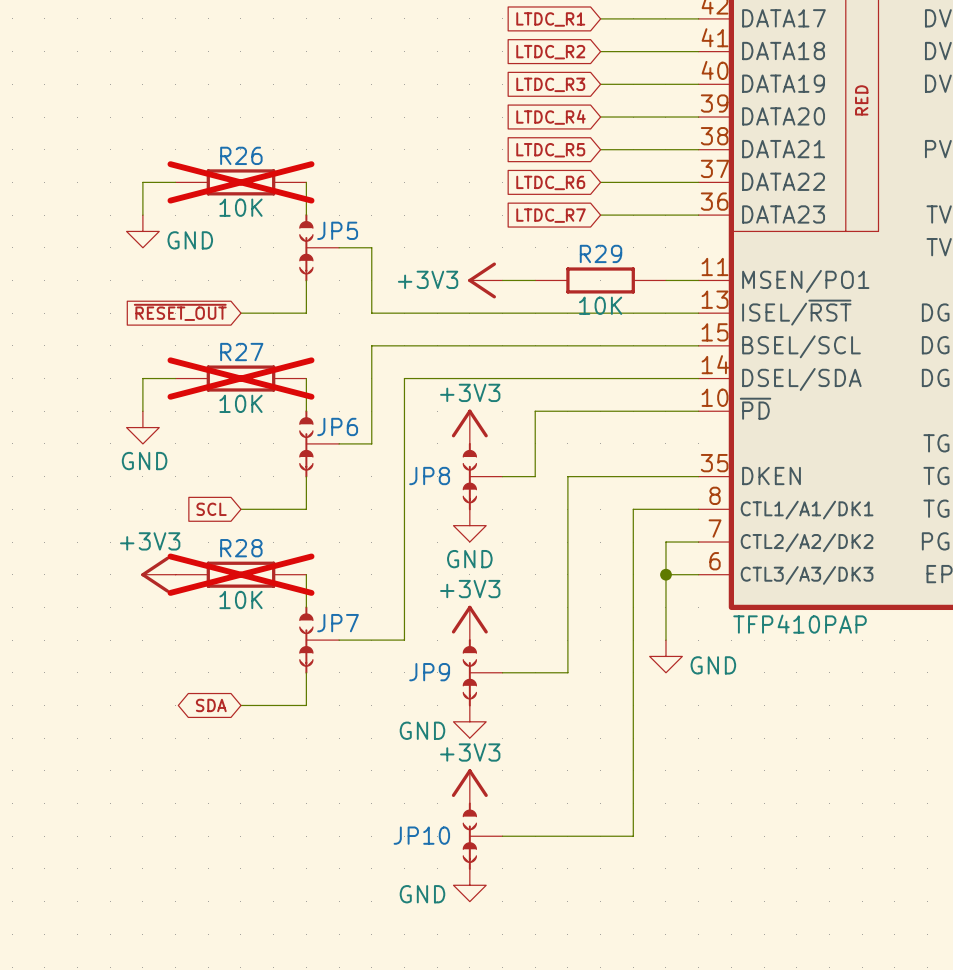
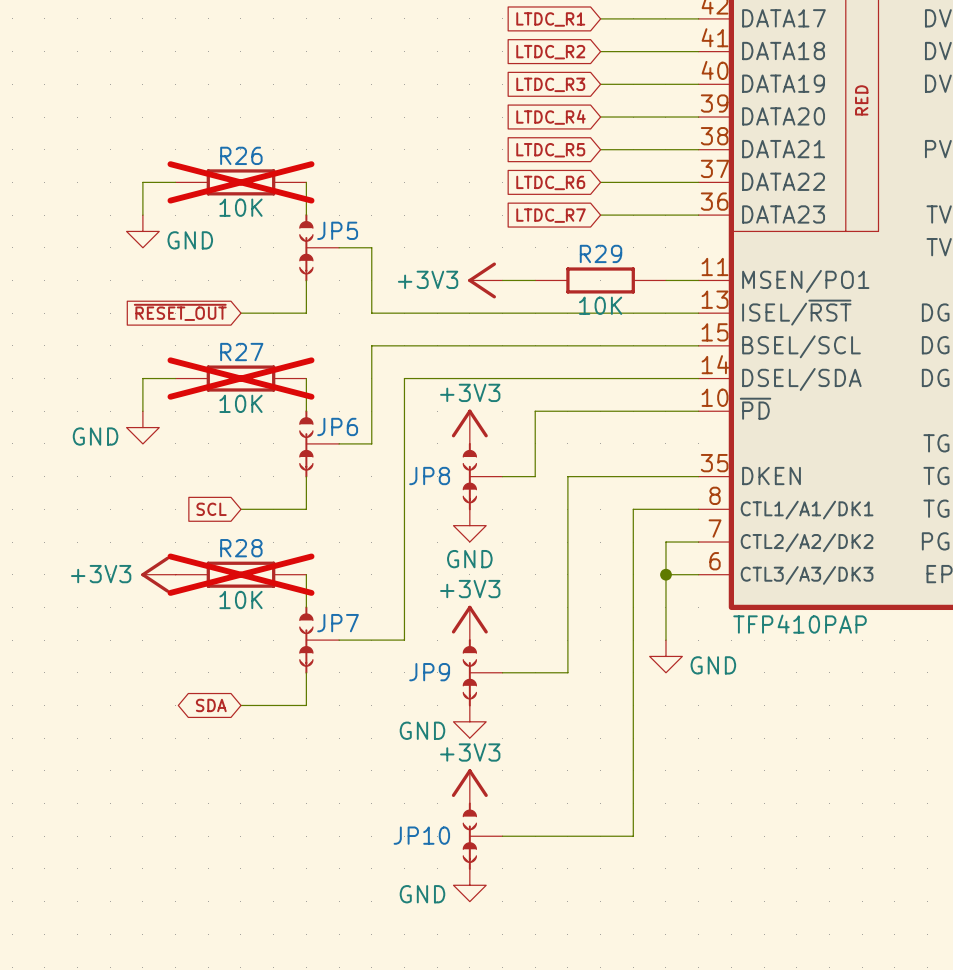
power symbol text position: GND (144, 461) -> GND (95, 436)
power symbol text position: +3V3 (150, 541) -> +3V3 (101, 574)

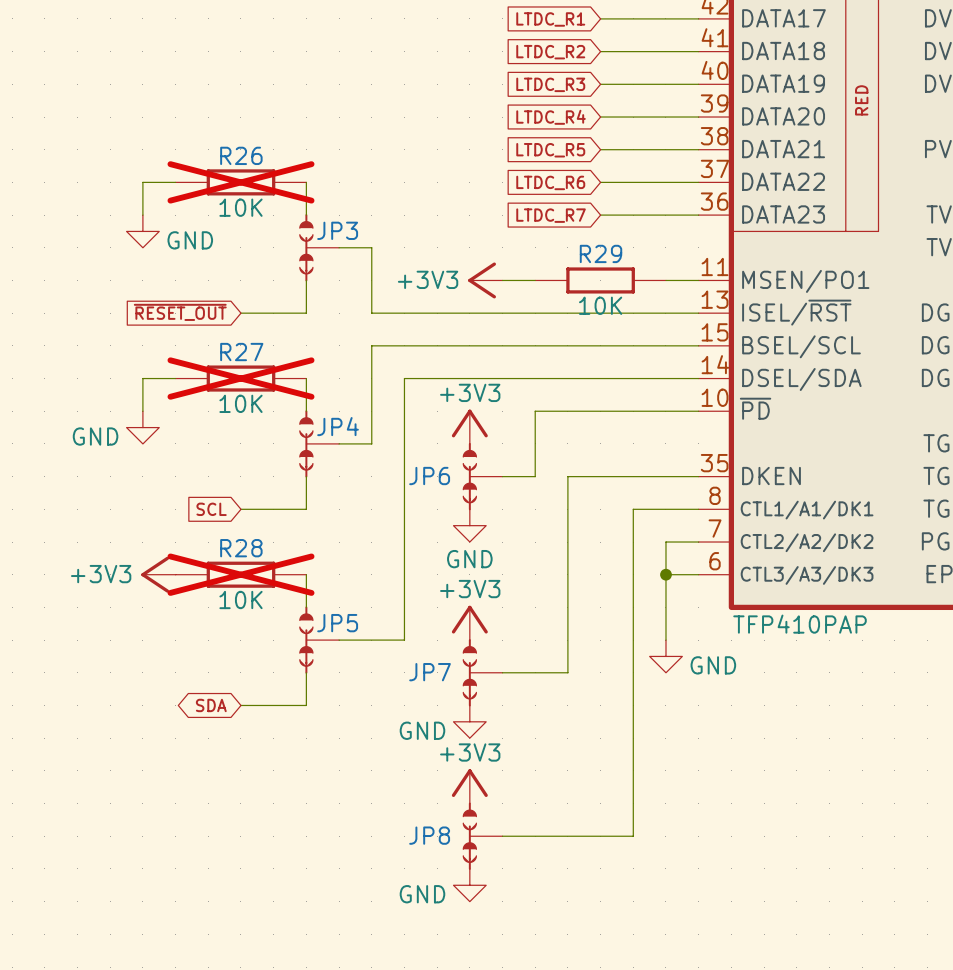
JP5 name: JP5 (337, 230) -> JP3 (337, 230)
JP6 name: JP6 (337, 426) -> JP4 (338, 426)
JP8 name: JP8 (429, 476) -> JP6 (429, 476)
JP7 name: JP7 (338, 623) -> JP5 (337, 623)
JP9 name: JP9 (429, 672) -> JP7 (430, 672)
JP10 name: JP10 (421, 835) -> JP8 (429, 835)

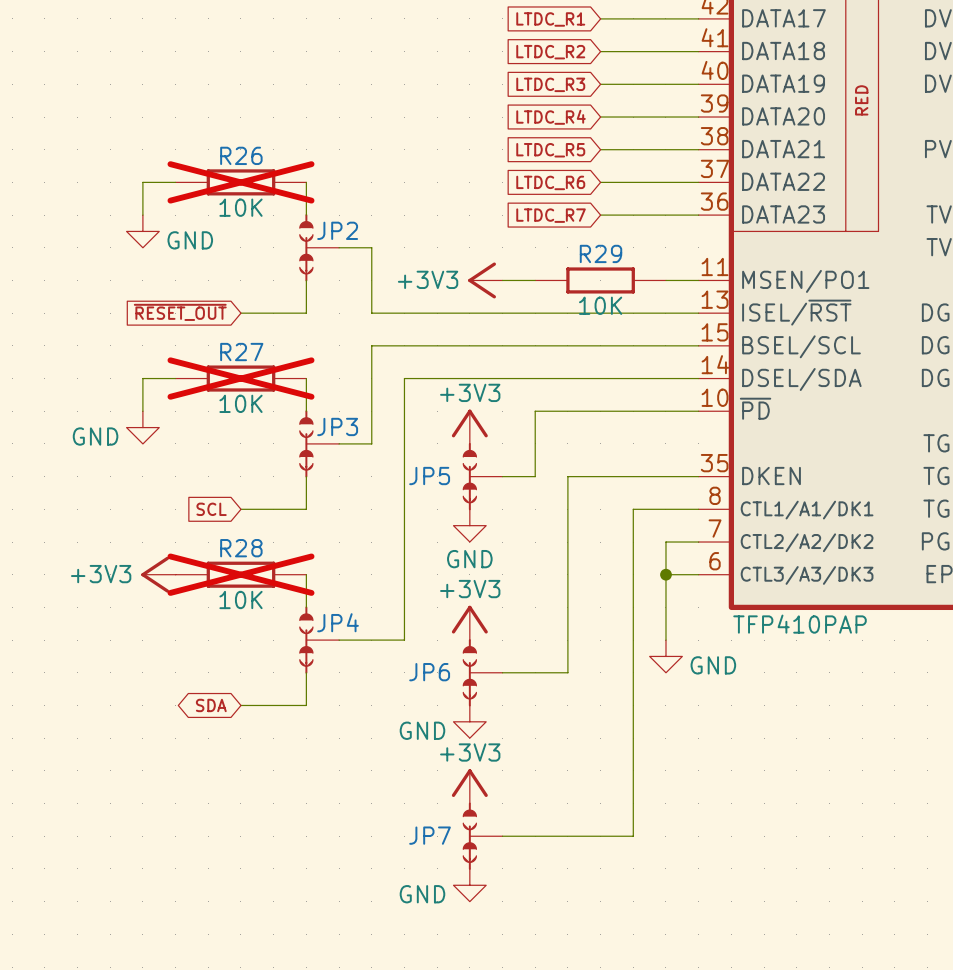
JP3 name: JP3 (337, 230) -> JP2 (337, 230)
JP4 name: JP4 (338, 426) -> JP3 (337, 426)
JP6 name: JP6 (429, 476) -> JP5 (429, 476)
JP5 name: JP5 (337, 623) -> JP4 (338, 622)
JP7 name: JP7 (430, 672) -> JP6 (429, 672)
JP8 name: JP8 (429, 835) -> JP7 (430, 835)

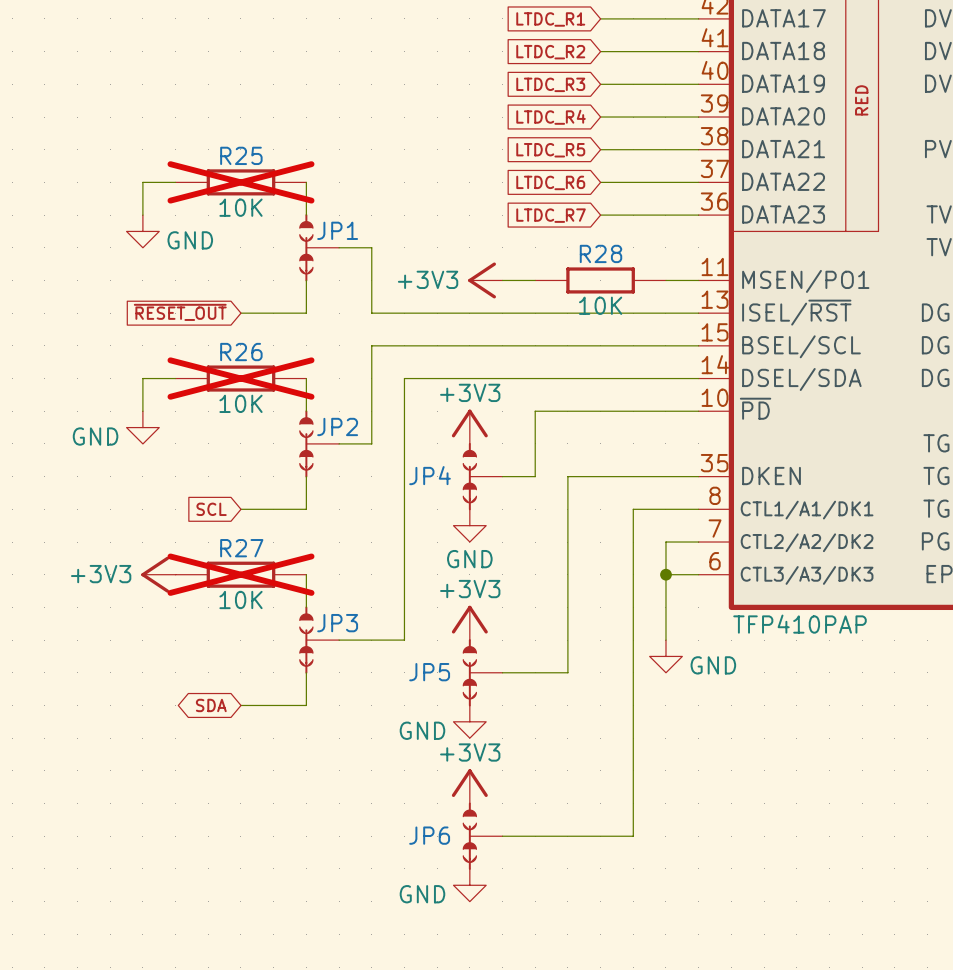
R26 name: R26 (241, 155) -> R25 (241, 155)
JP2 name: JP2 (337, 230) -> JP1 (337, 230)
R29 name: R29 (601, 253) -> R28 (601, 253)
R27 name: R27 (241, 352) -> R26 (241, 352)
JP3 name: JP3 (337, 426) -> JP2 (337, 426)
JP5 name: JP5 (429, 476) -> JP4 (430, 475)
R28 name: R28 (241, 548) -> R27 (241, 548)
JP4 name: JP4 (338, 622) -> JP3 (337, 623)
JP6 name: JP6 (429, 672) -> JP5 (429, 672)
JP7 name: JP7 (430, 835) -> JP6 (429, 835)

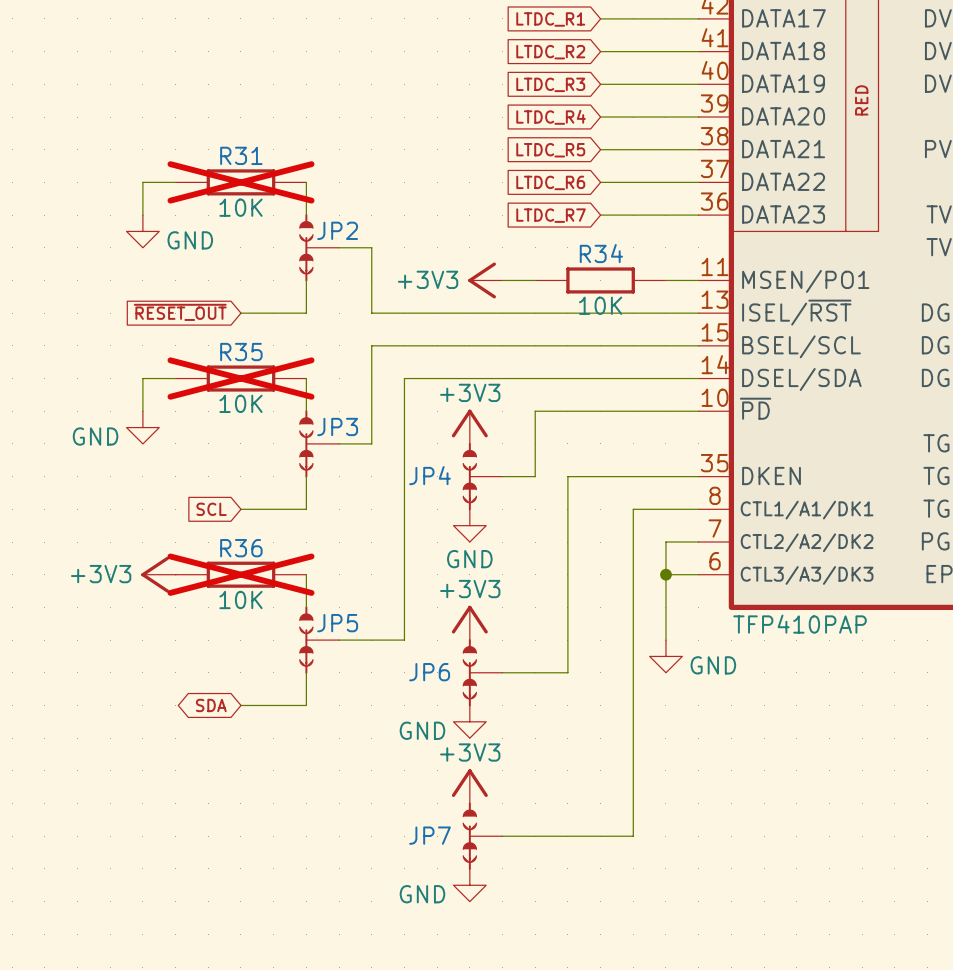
R25 name: R25 (241, 155) -> R31 (241, 155)
JP1 name: JP1 (337, 230) -> JP2 (337, 230)
R28 name: R28 (601, 253) -> R34 (601, 253)
R26 name: R26 (241, 352) -> R35 (241, 352)
JP2 name: JP2 (337, 426) -> JP3 (337, 426)
R27 name: R27 (241, 548) -> R36 (241, 548)
JP3 name: JP3 (337, 623) -> JP5 (337, 623)
JP5 name: JP5 (429, 672) -> JP6 (429, 672)
JP6 name: JP6 (429, 835) -> JP7 (430, 835)

